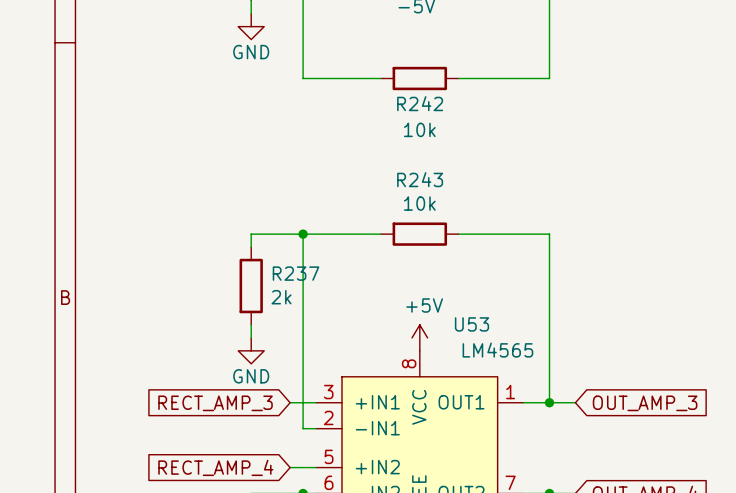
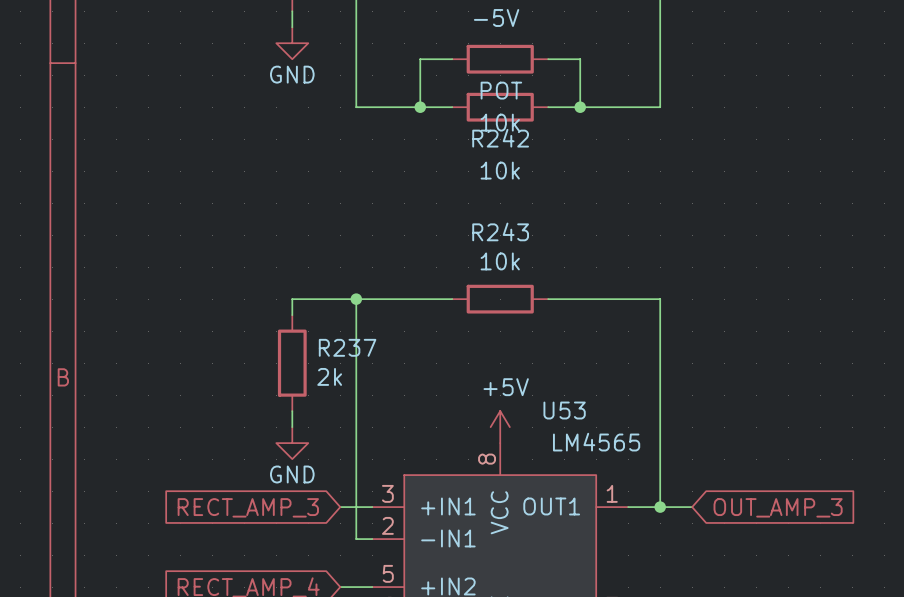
wire: none -> (452, 59) (420, 59) (420, 107)
POT: none -> 10k (500, 59)
wire: none -> (548, 59) (580, 59) (580, 107)
junction: none -> (420, 107)
junction: none -> (580, 107)

